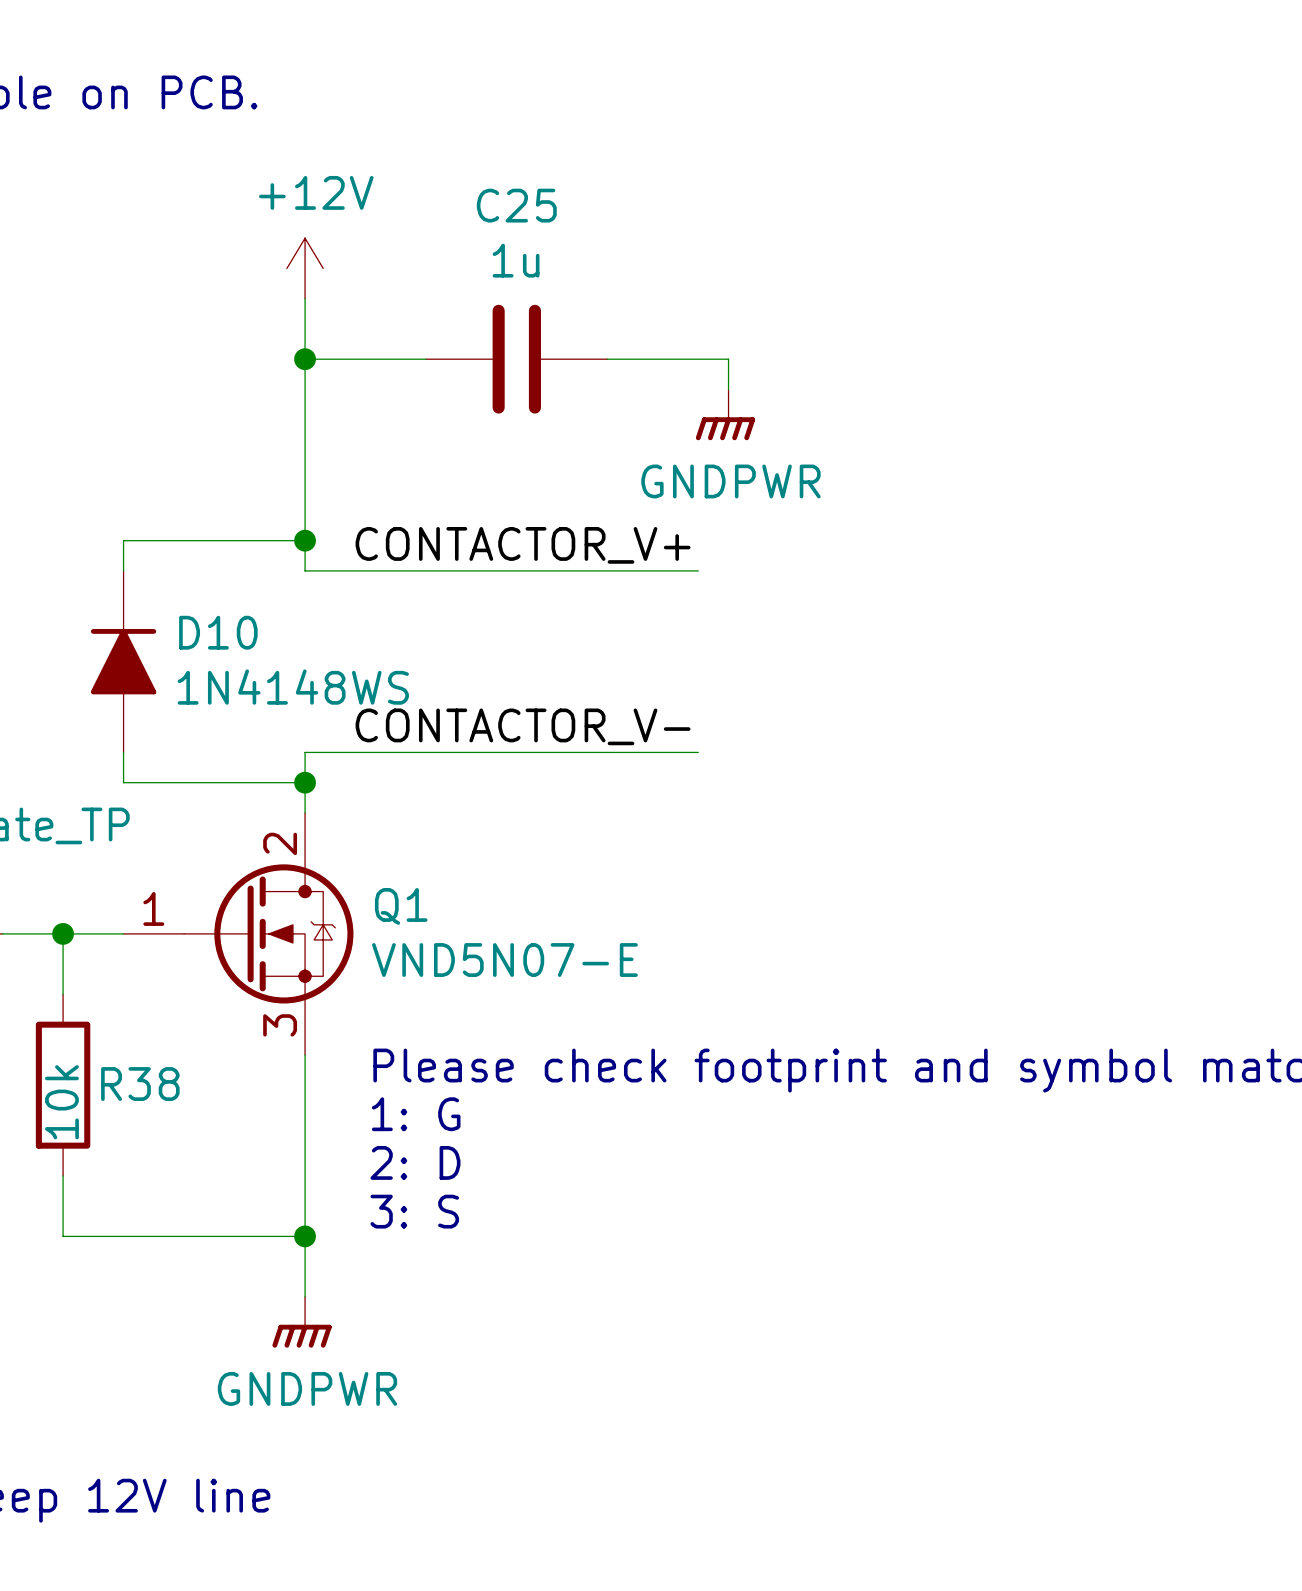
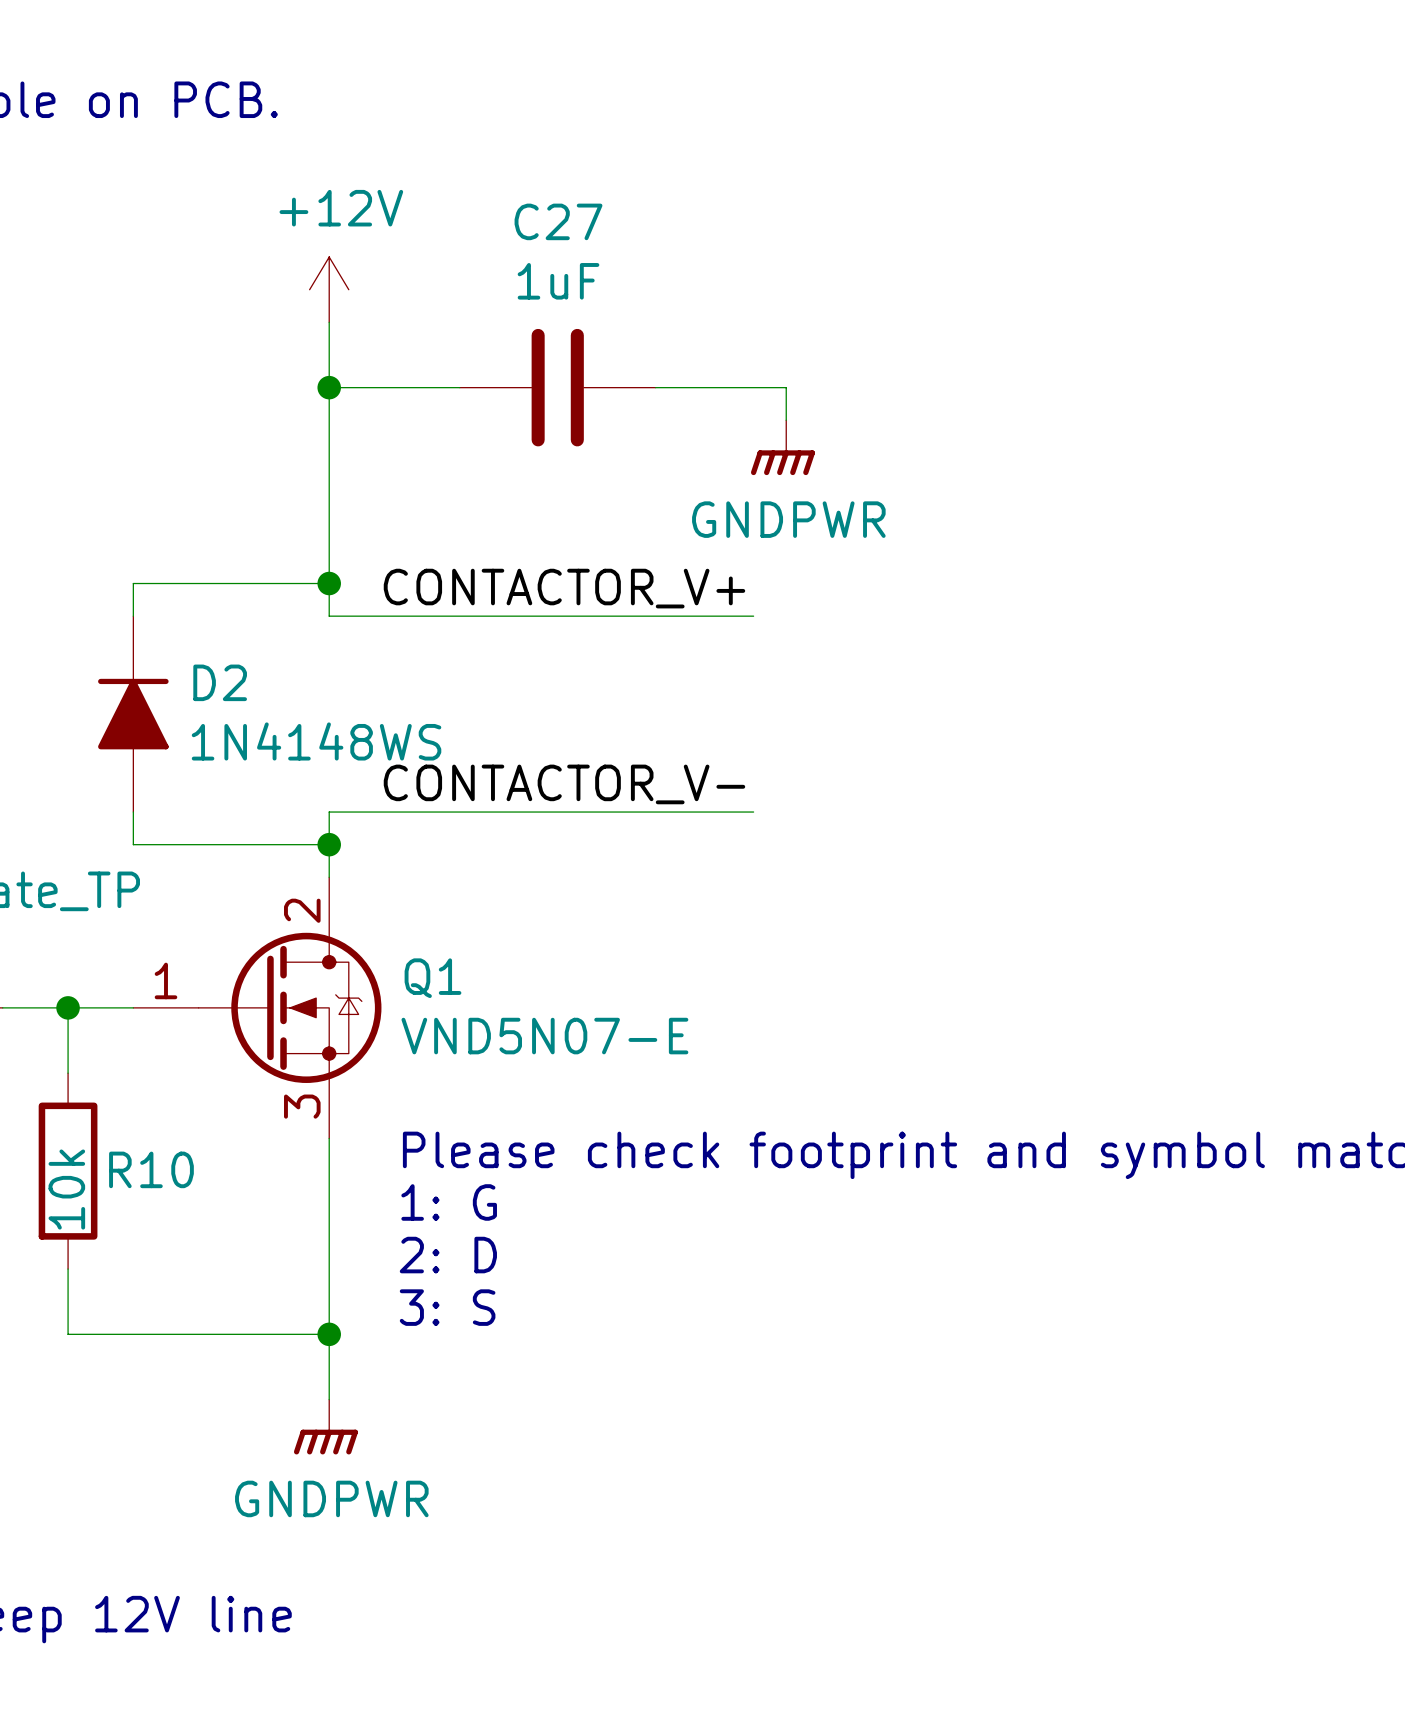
C25 name: C25 (516, 205) -> C27 (558, 221)
C25 value: 1u (516, 260) -> 1uF (558, 281)
D10 name: D10 (218, 632) -> D2 (220, 682)
R38 name: R38 (140, 1084) -> R10 (151, 1169)

